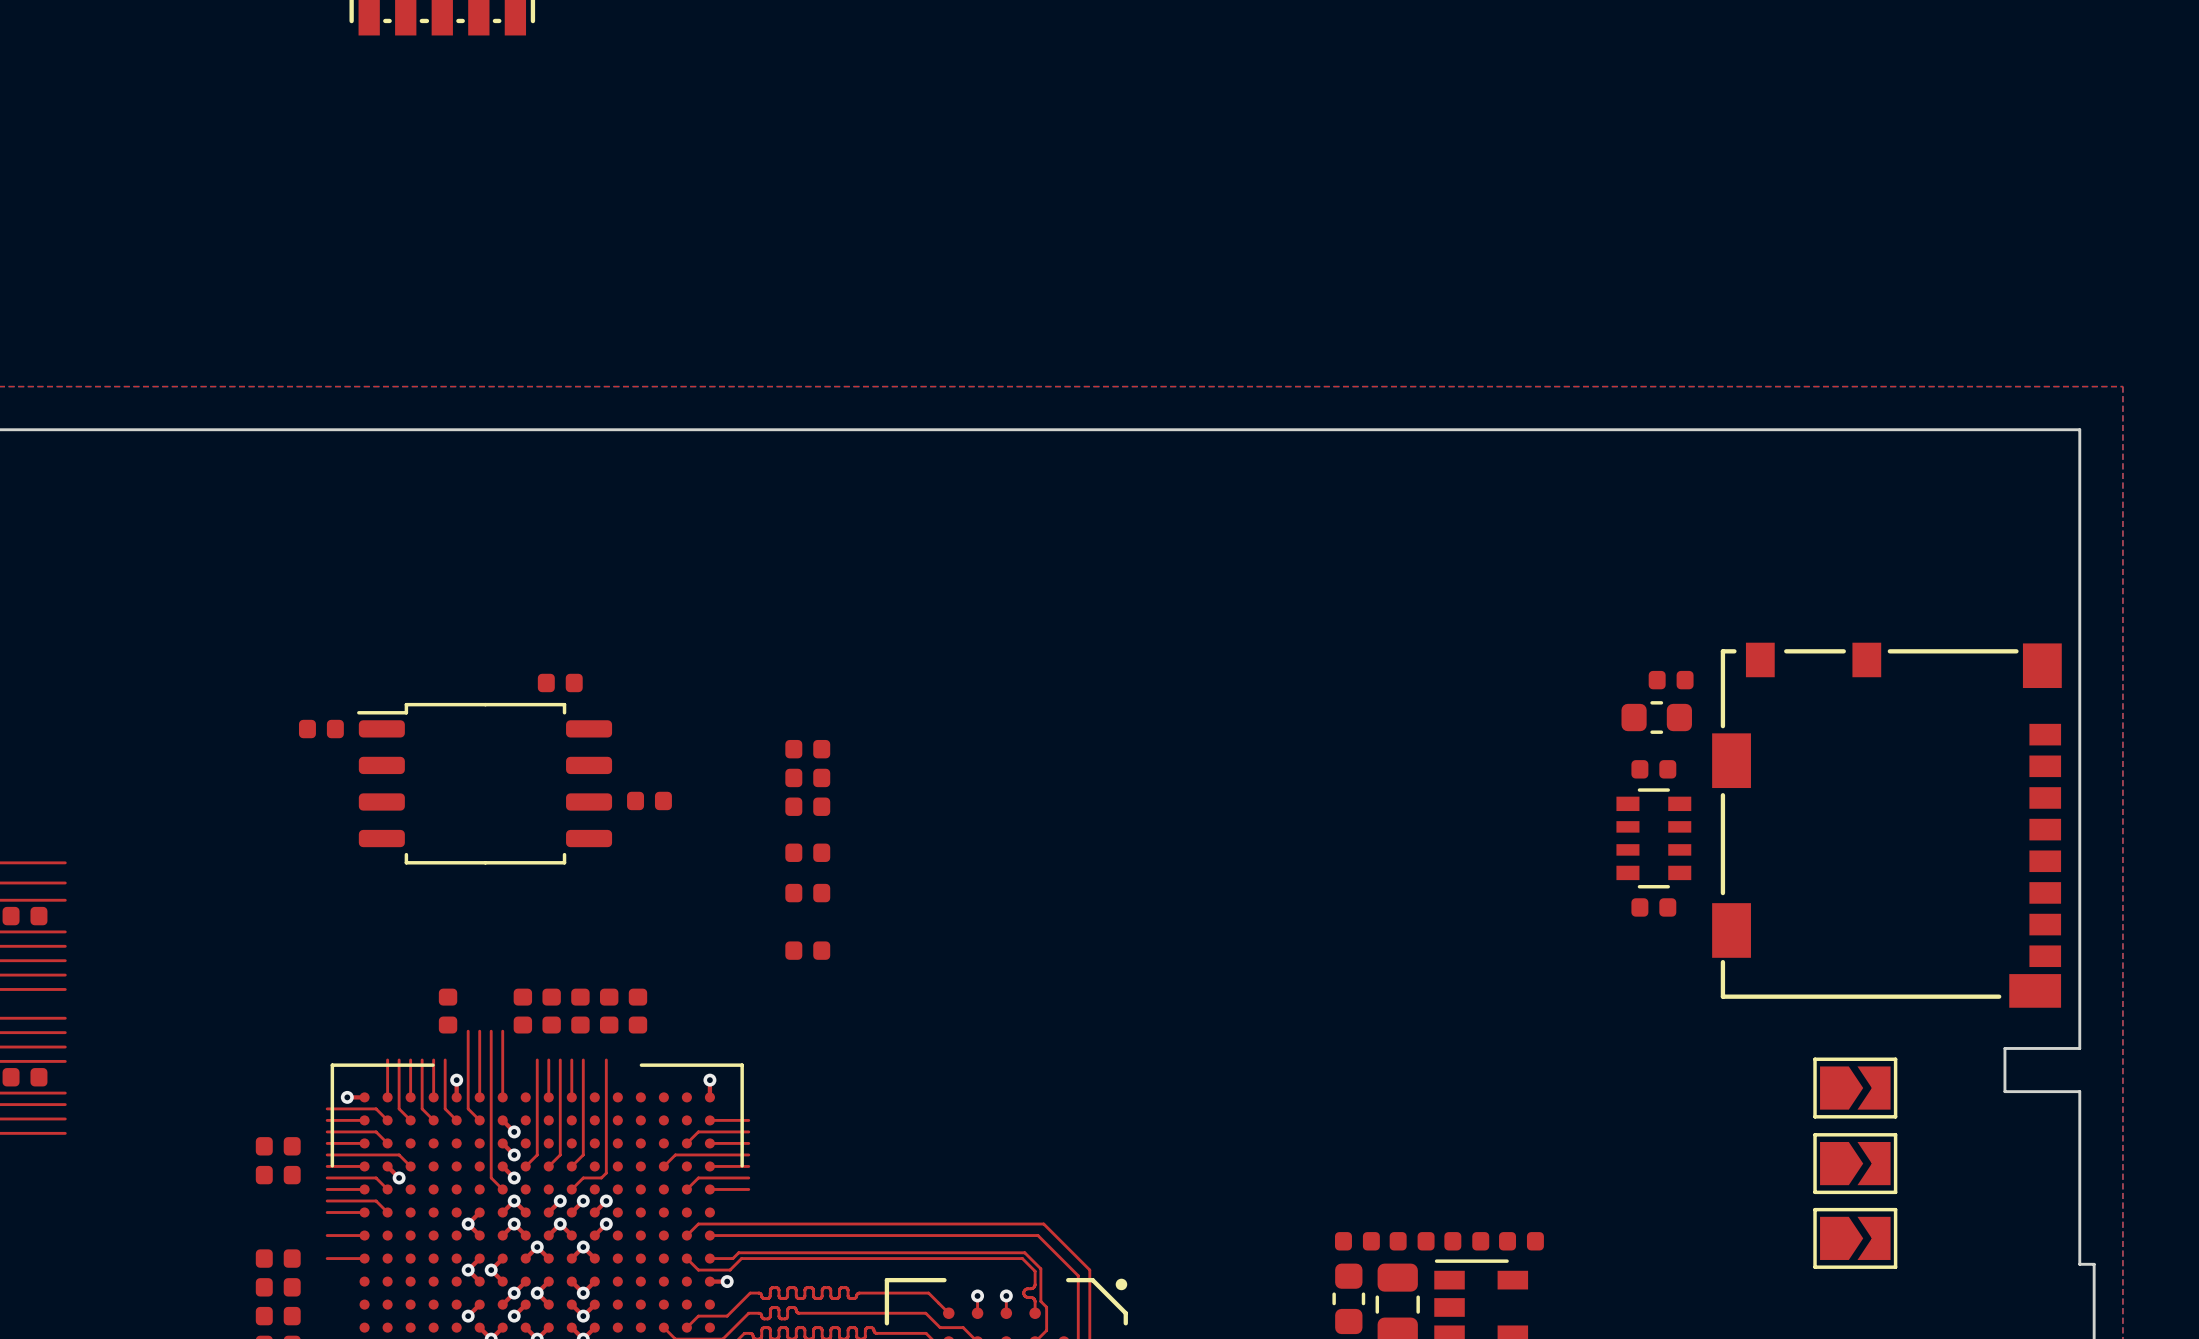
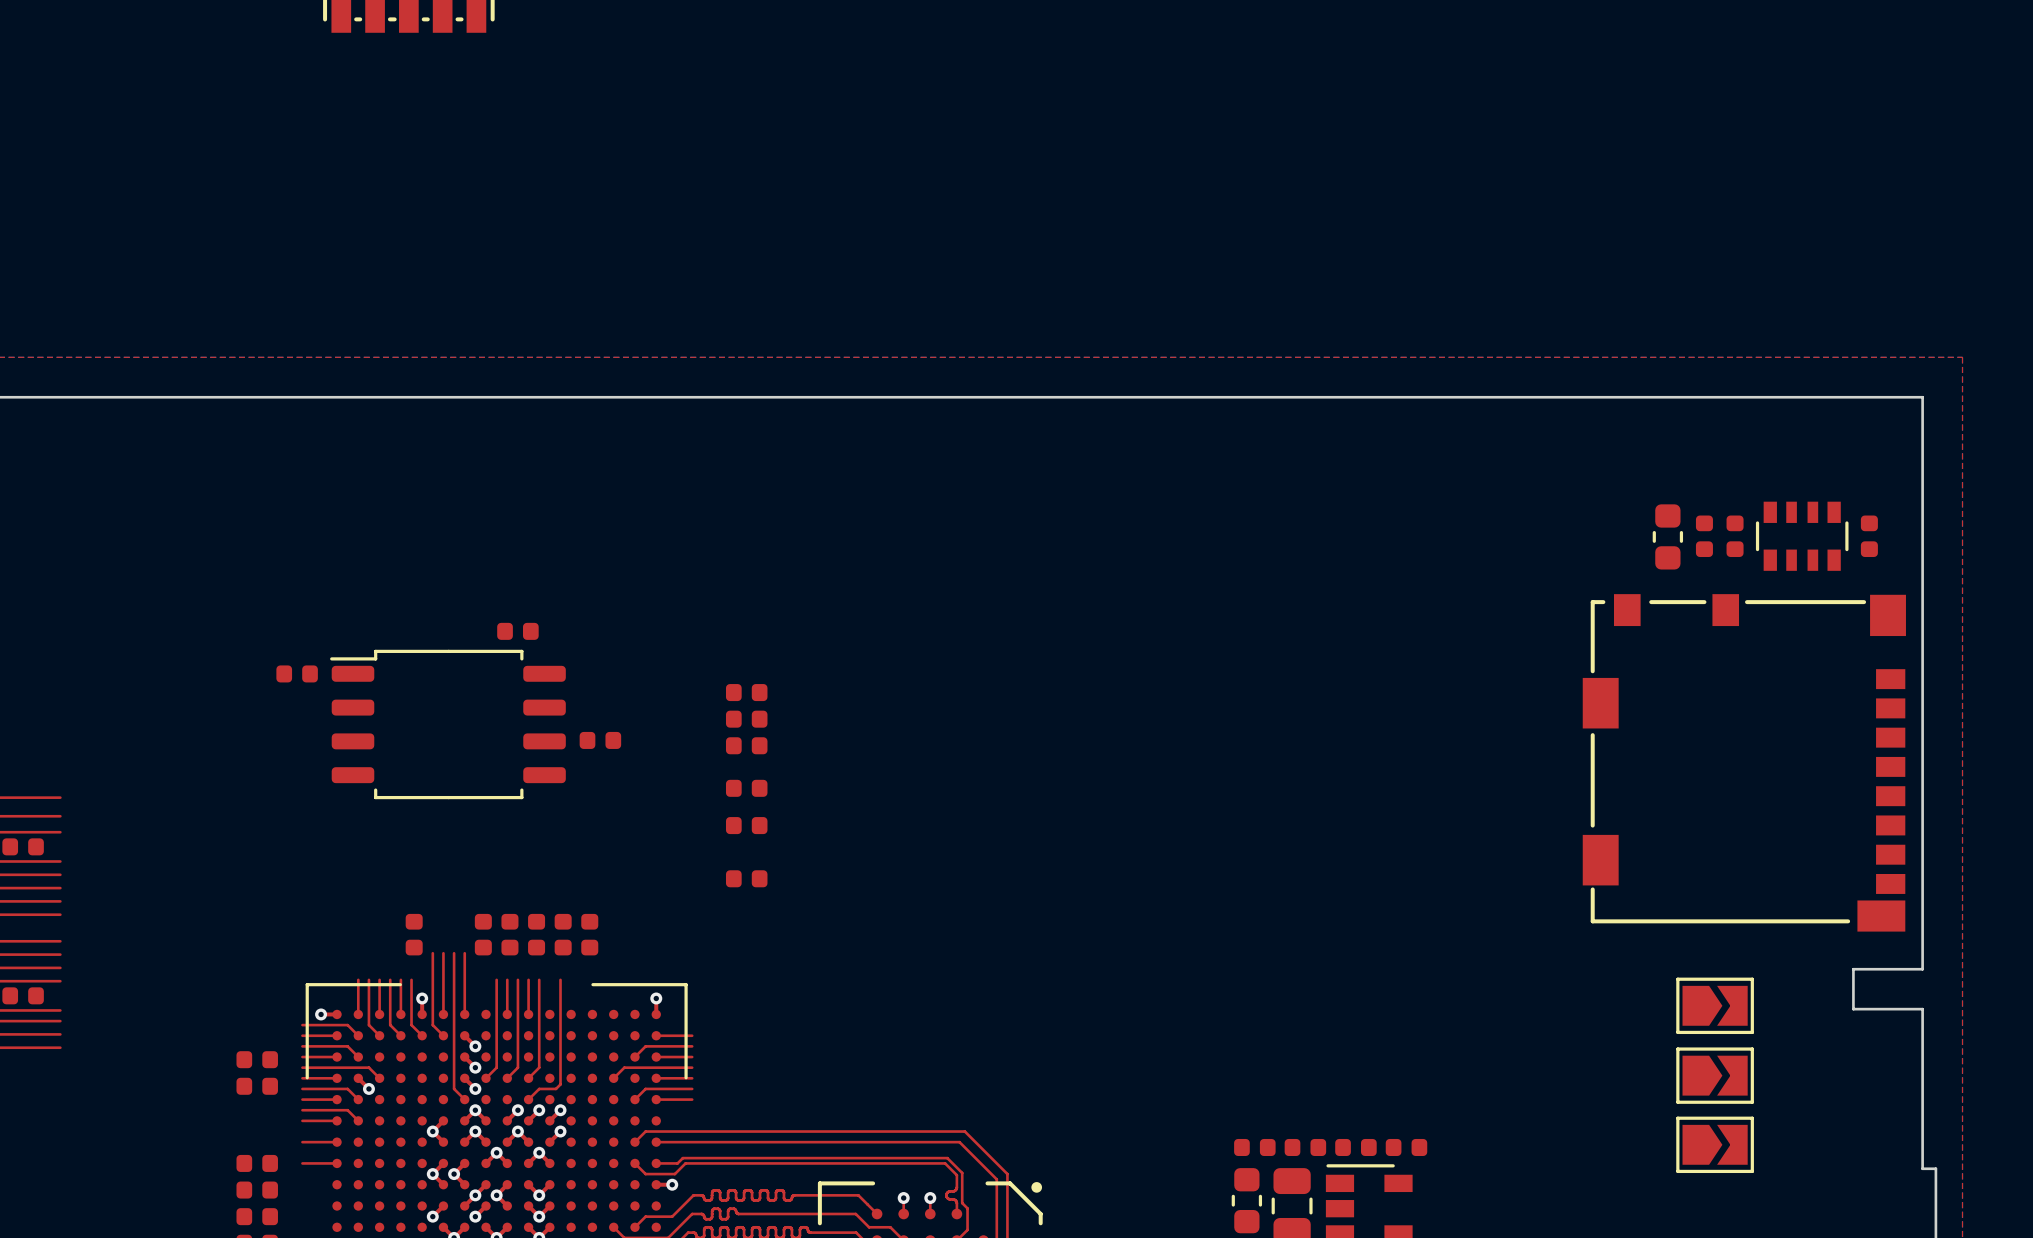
part: none -> (1704, 536)
part: none -> (1735, 536)
part: none -> (1869, 536)
part: (1671, 680) -> none
part rotation: 0° (1656, 717) -> 90° clockwise (1667, 536)
part position: (1656, 717) -> (1667, 536)
part: (1653, 769) -> none
part rotation: 0° (1653, 838) -> 90° clockwise (1802, 536)
part position: (1653, 838) -> (1802, 536)
part: (1653, 907) -> none

